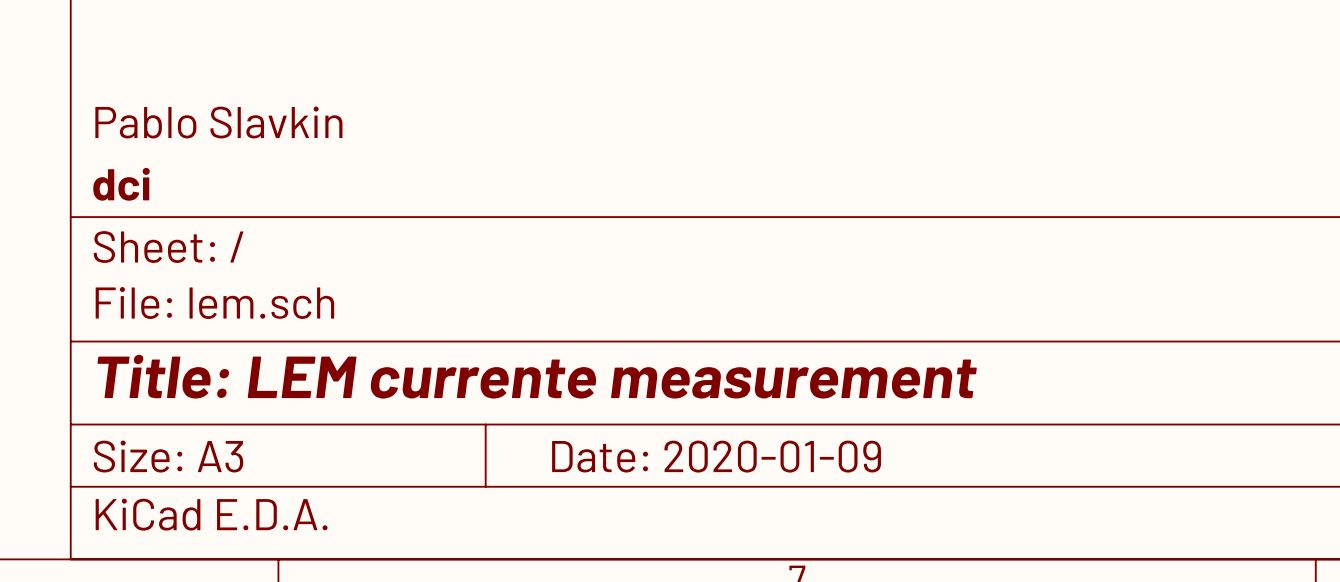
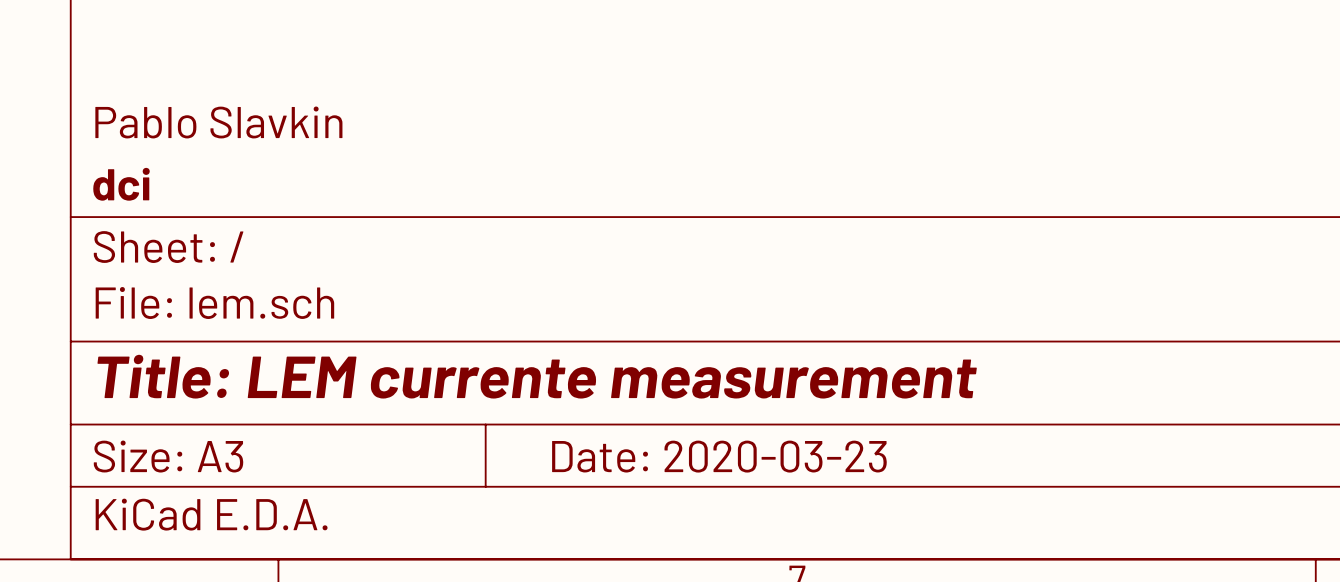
title block: Date: 2020-01-09 (716, 456) -> Date: 2020-03-23 (719, 456)

